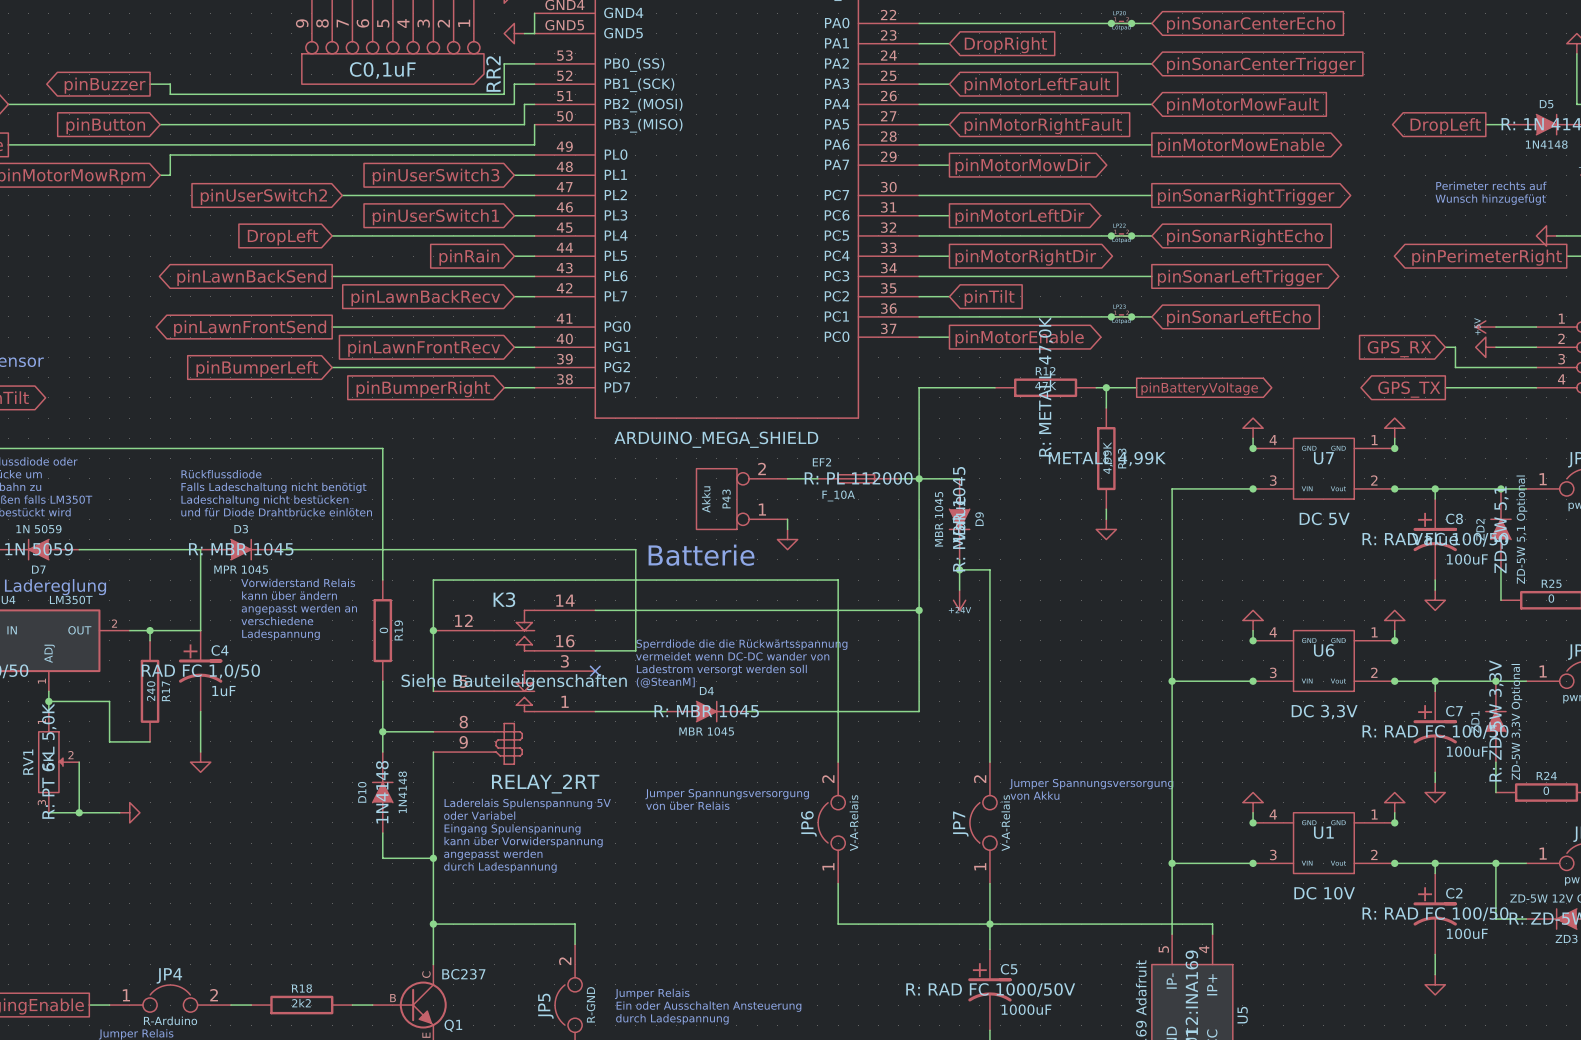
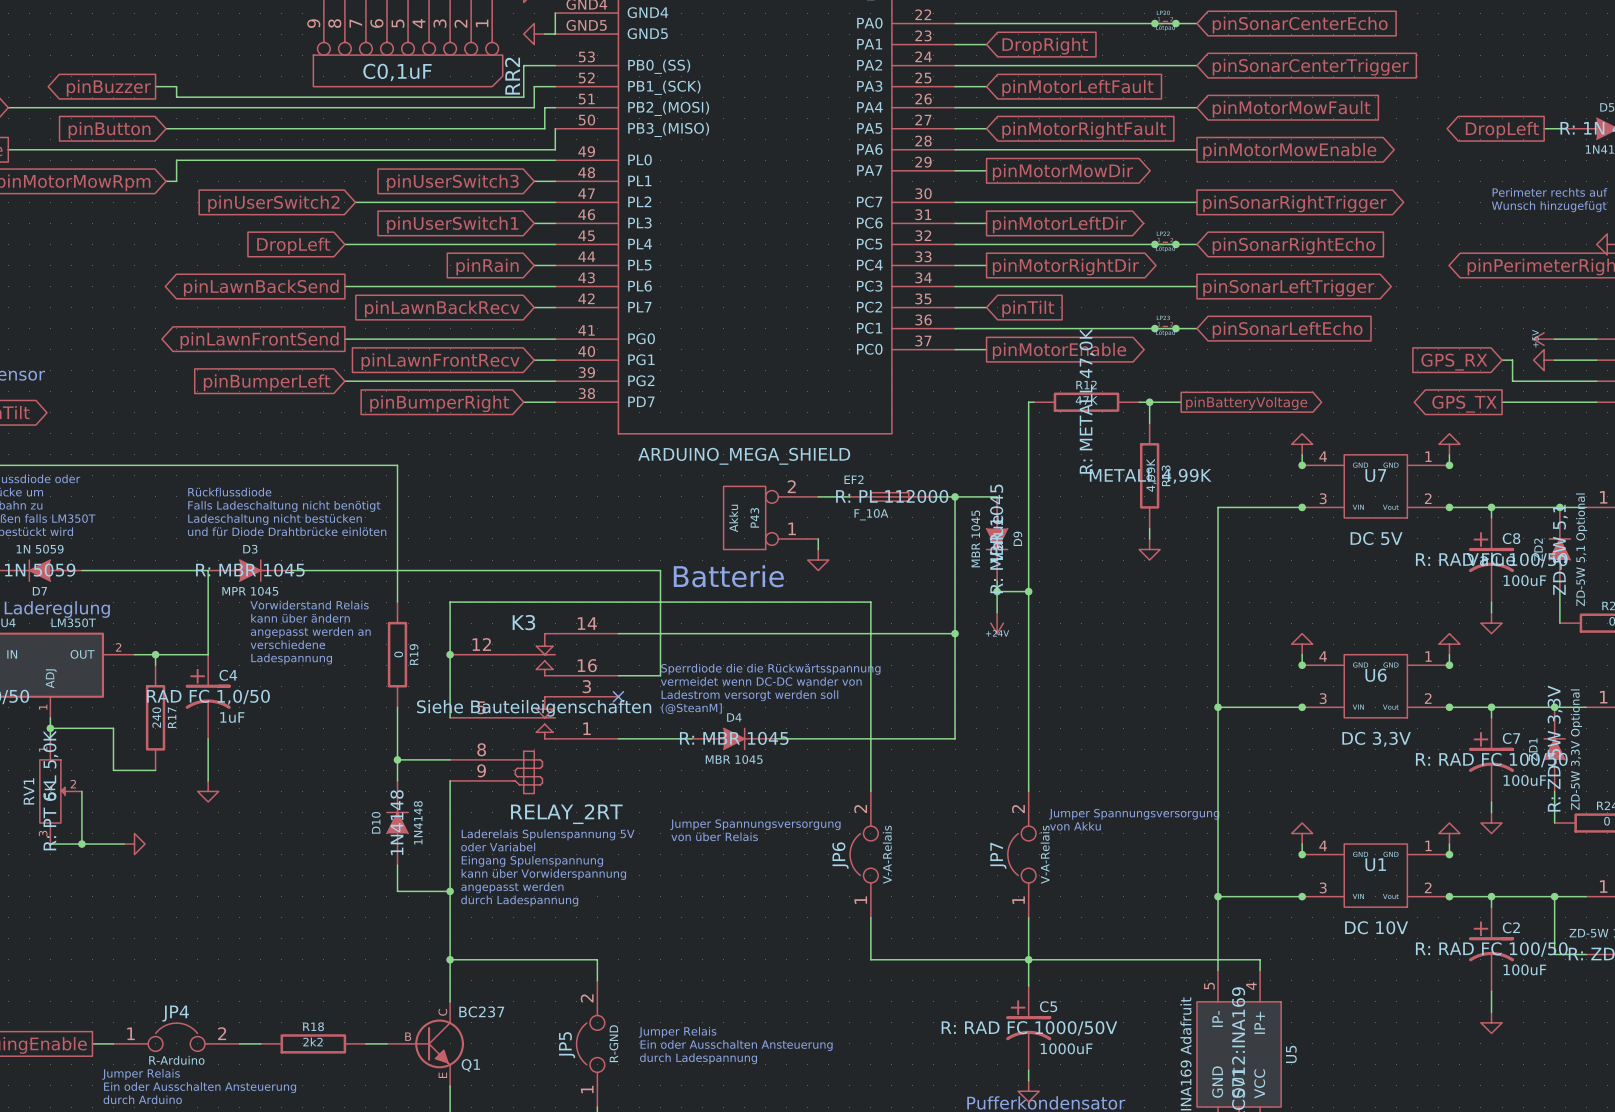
wire: (989, 387) (919, 387) (919, 478) -> (1028, 402) (1028, 591)
junction: none -> (1028, 591)

